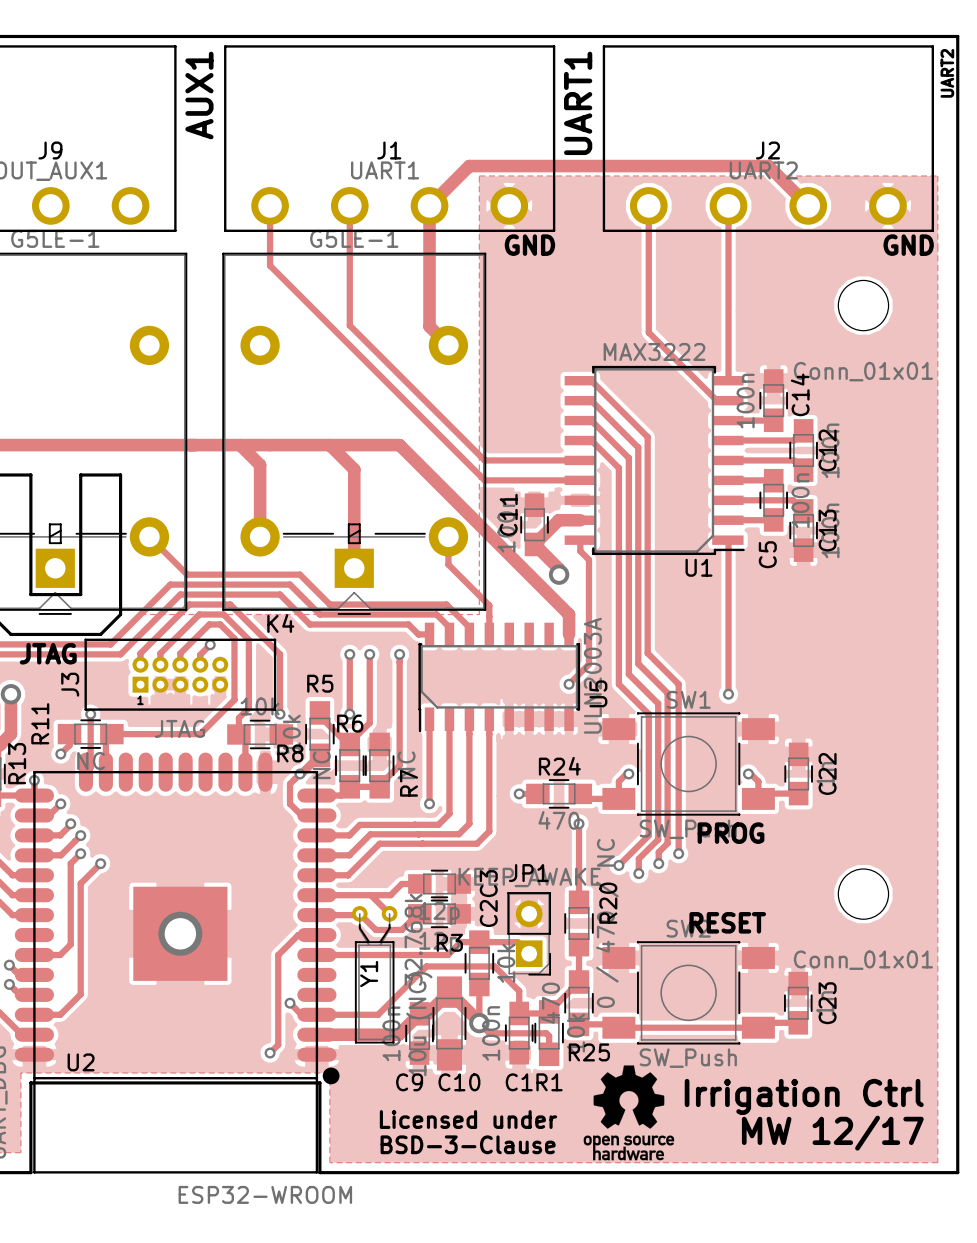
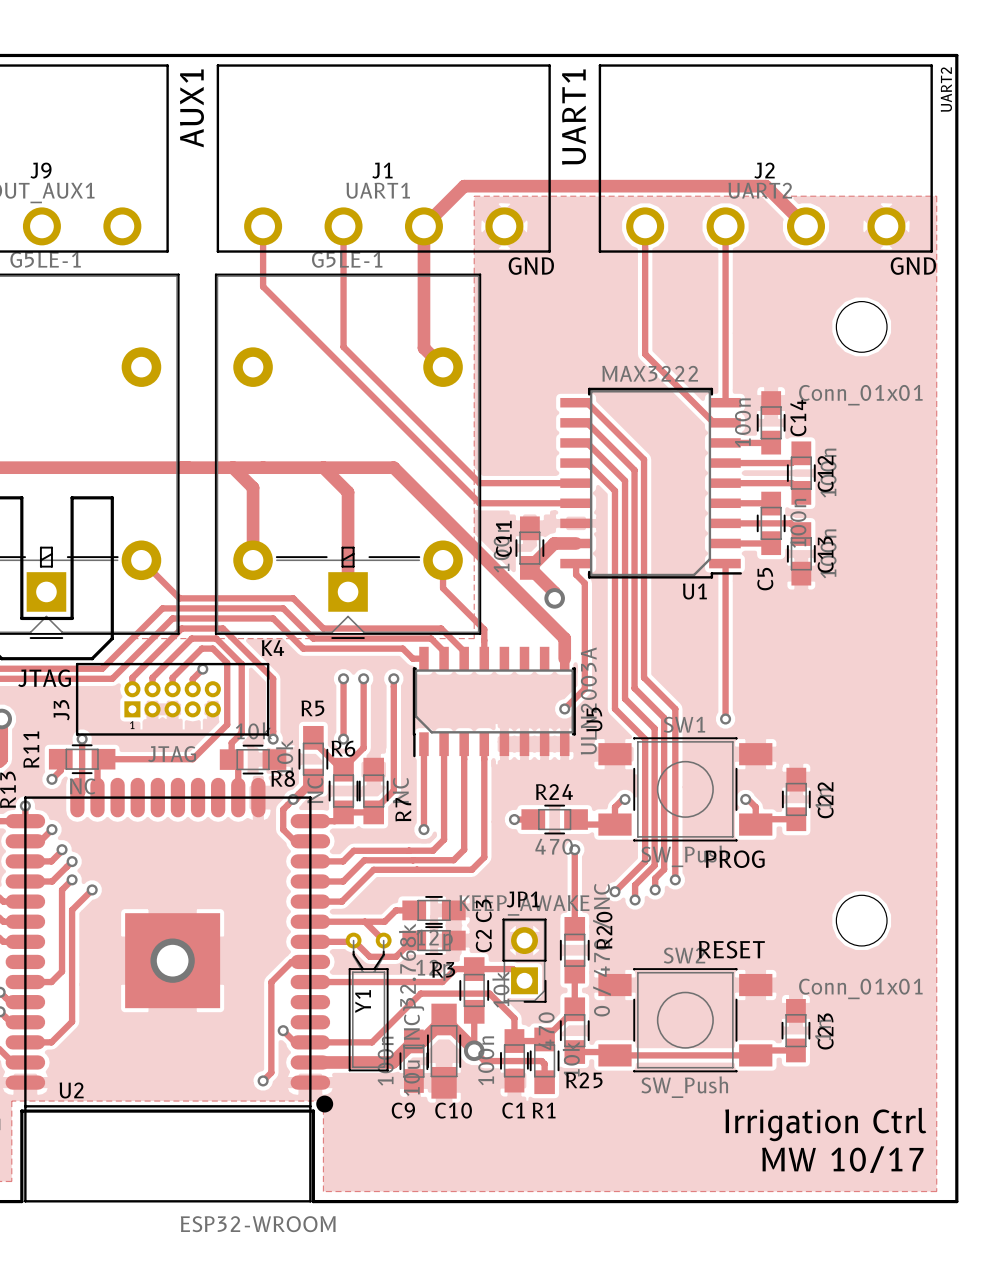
drawing: [583, 1065, 675, 1161] -> none
text: Licensed under (468, 1119) -> none
text: MW 12/17 (832, 1133) -> MW 10/17 (842, 1159)
text: BSD-3-Clause (468, 1144) -> none

